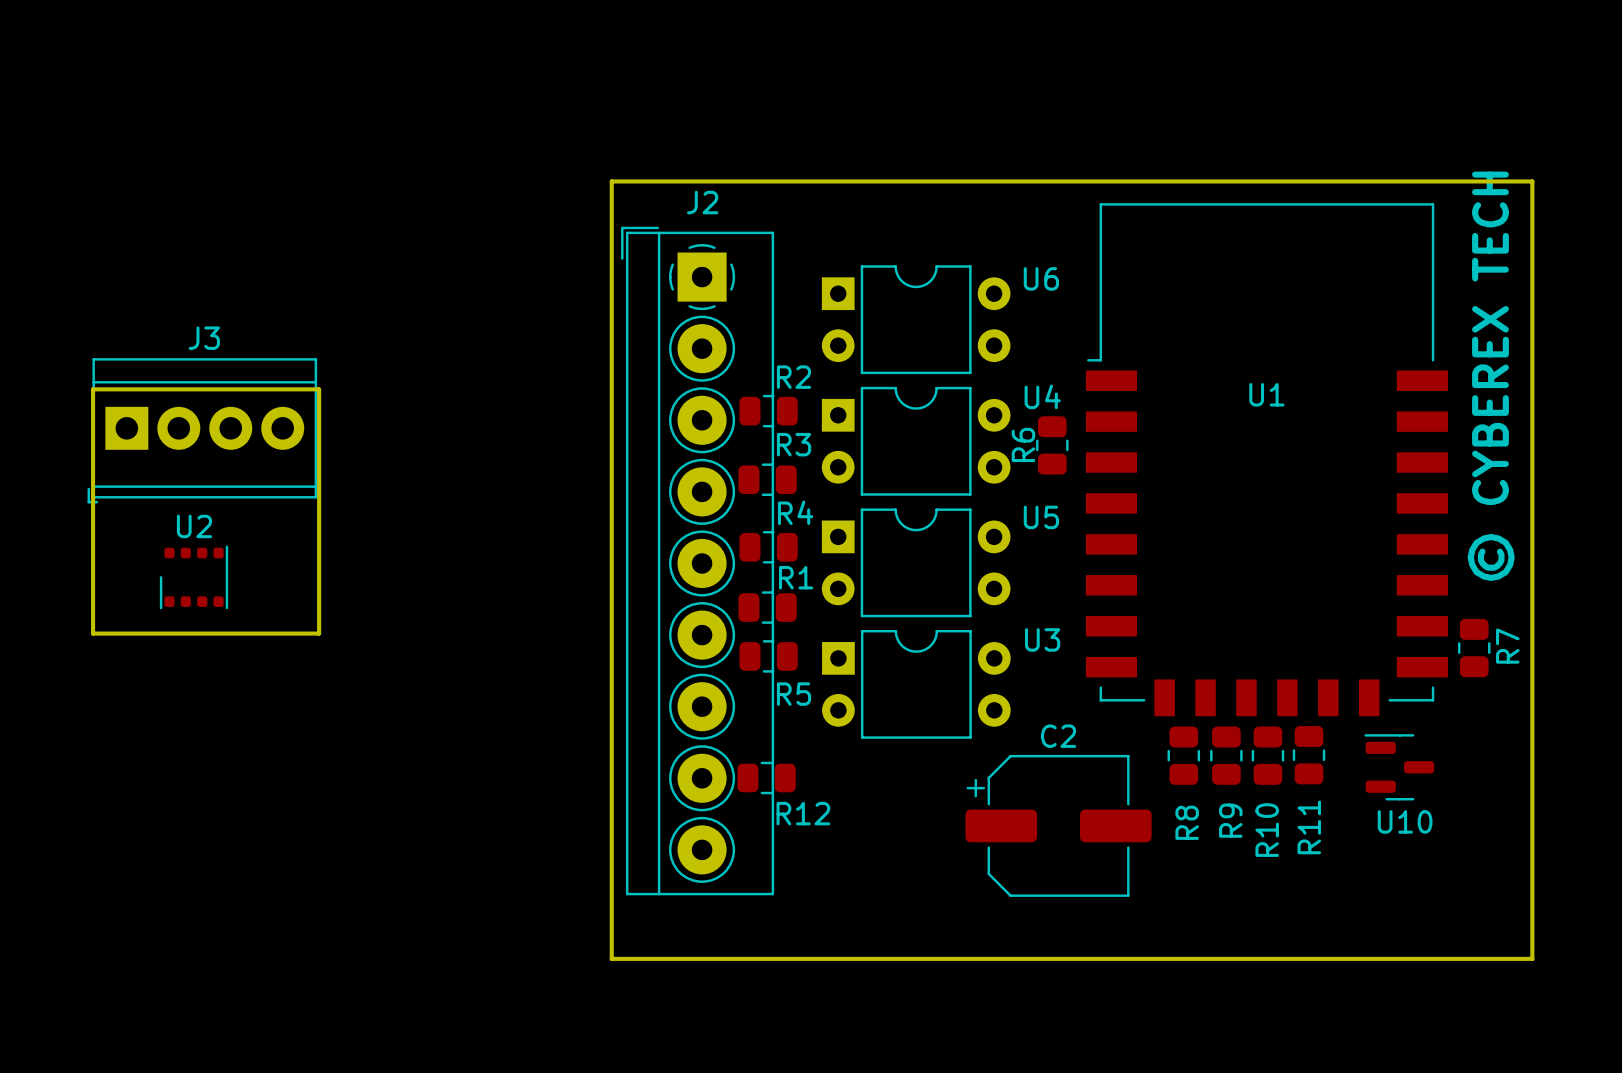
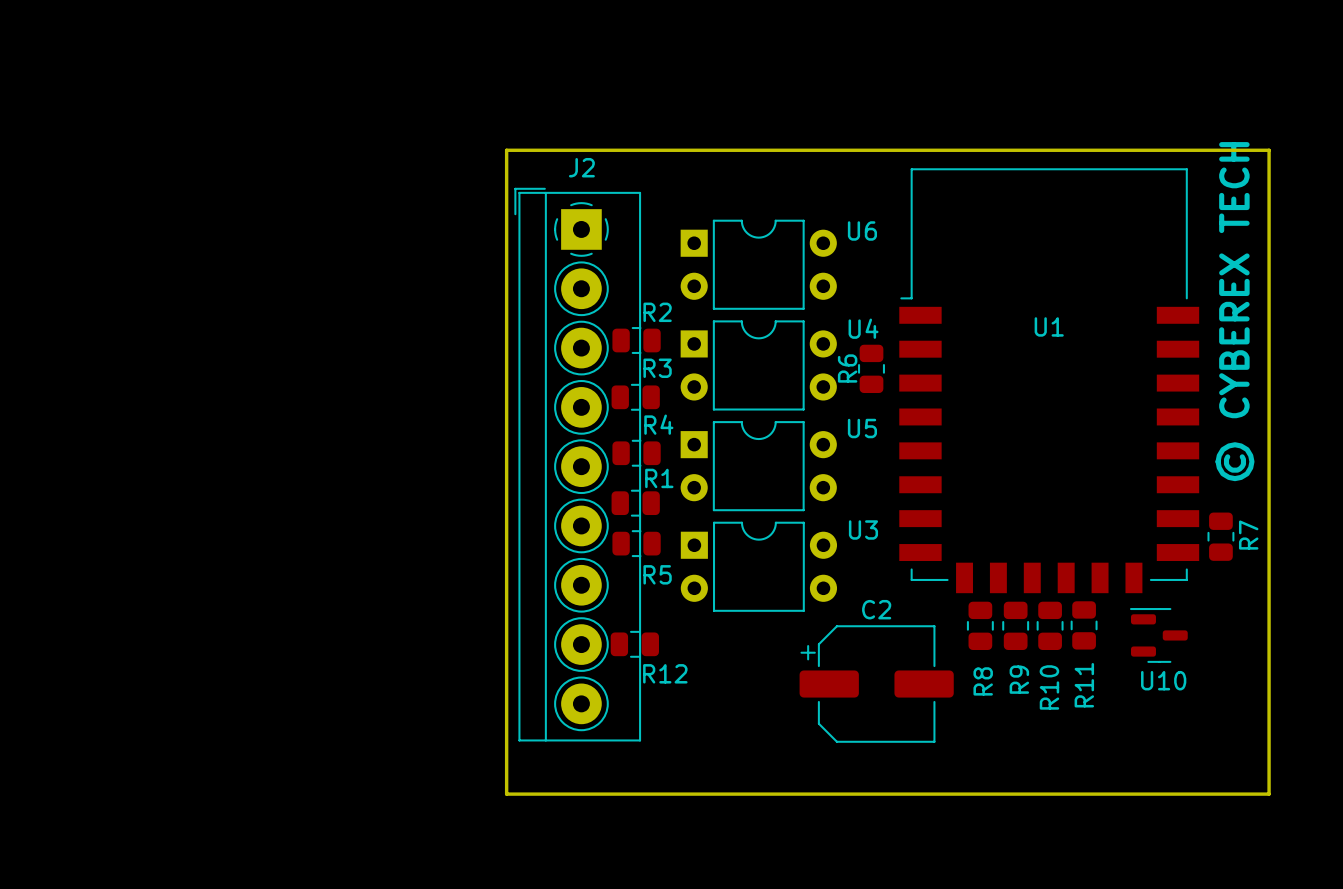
board edge: (93, 389) (319, 389) (319, 633) (93, 633) (93, 389) -> none
J3: (202, 430) -> none
U2: (194, 577) -> none

